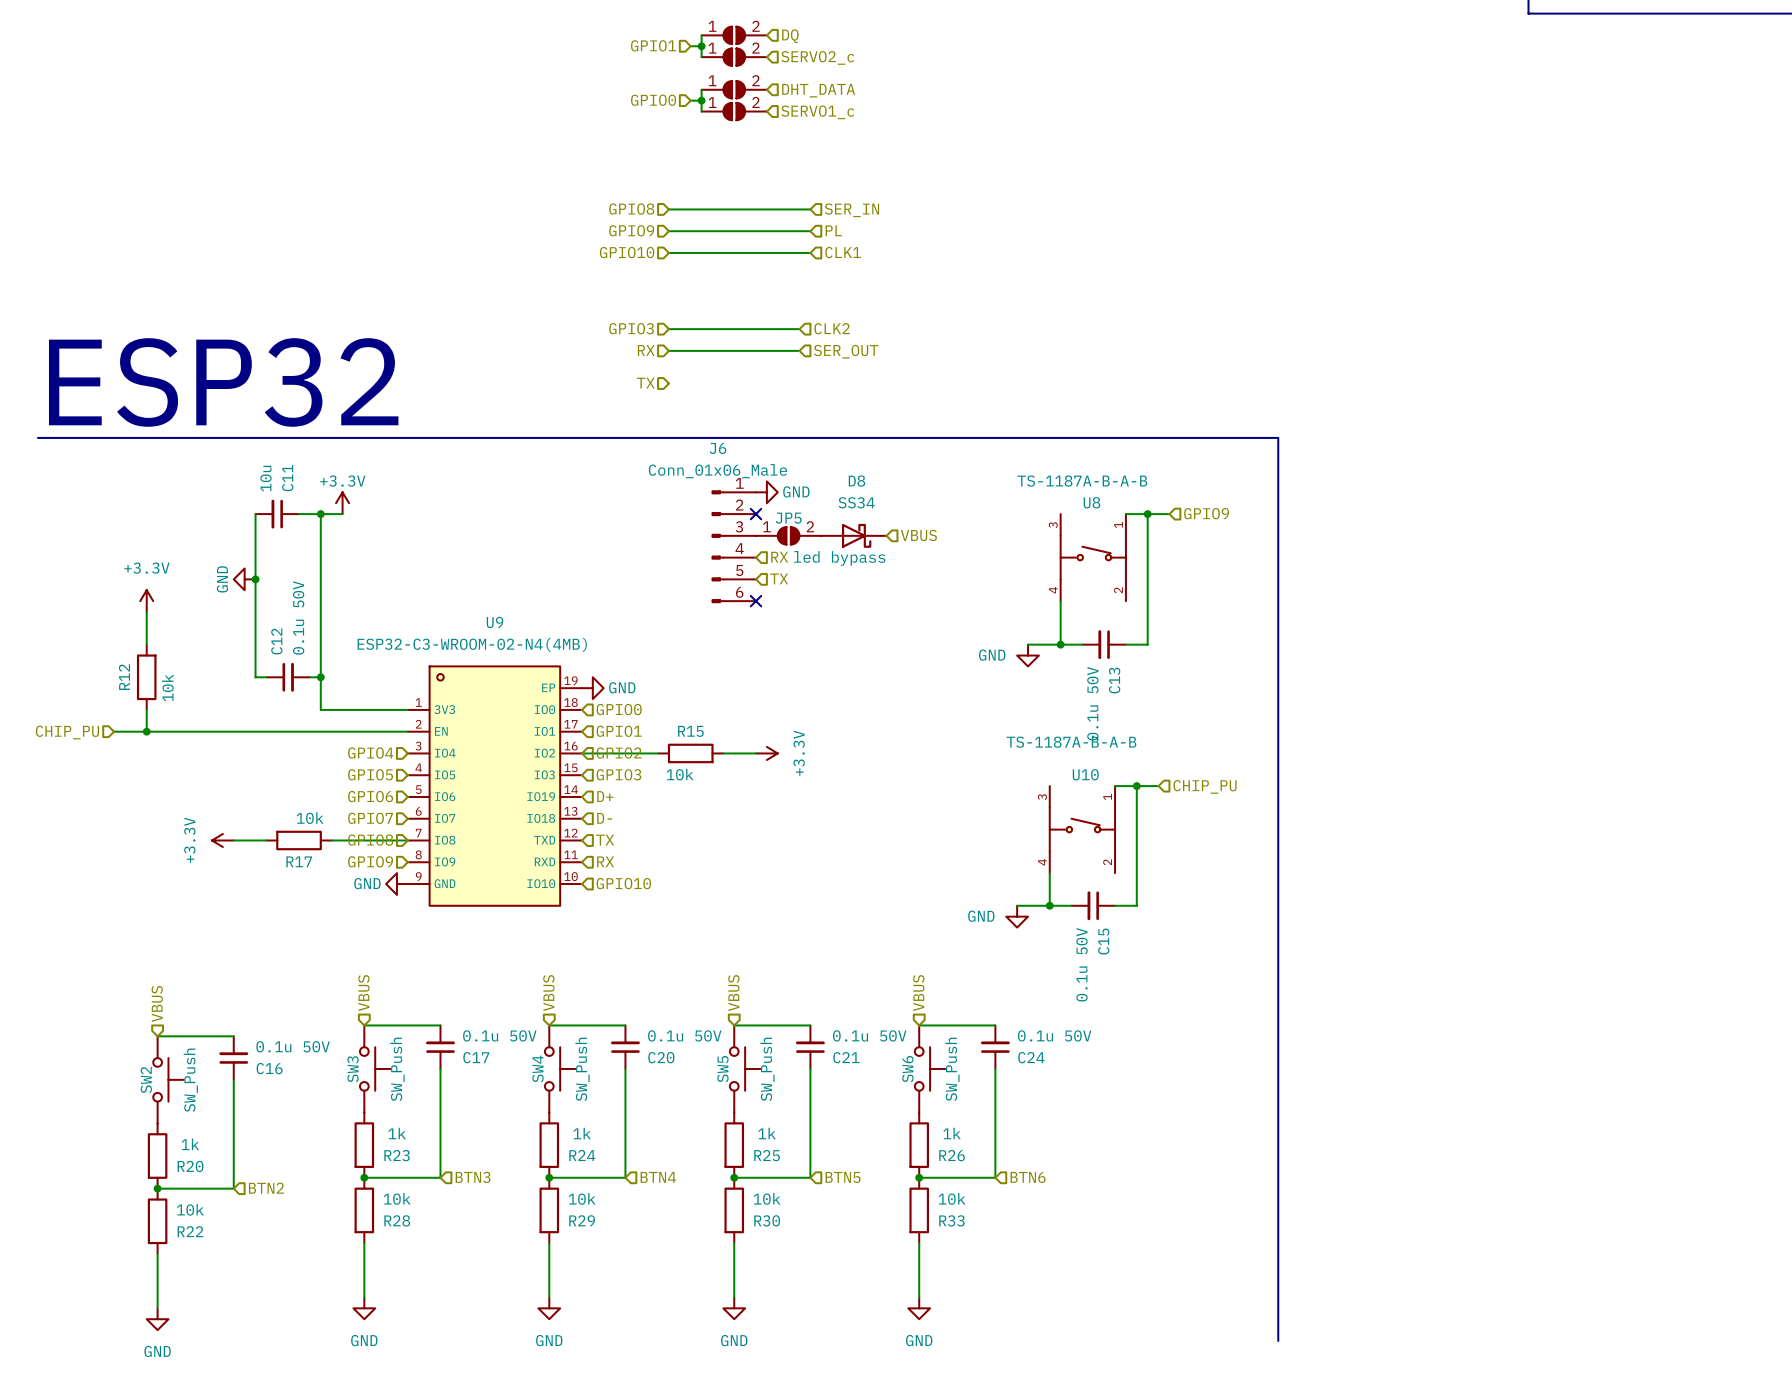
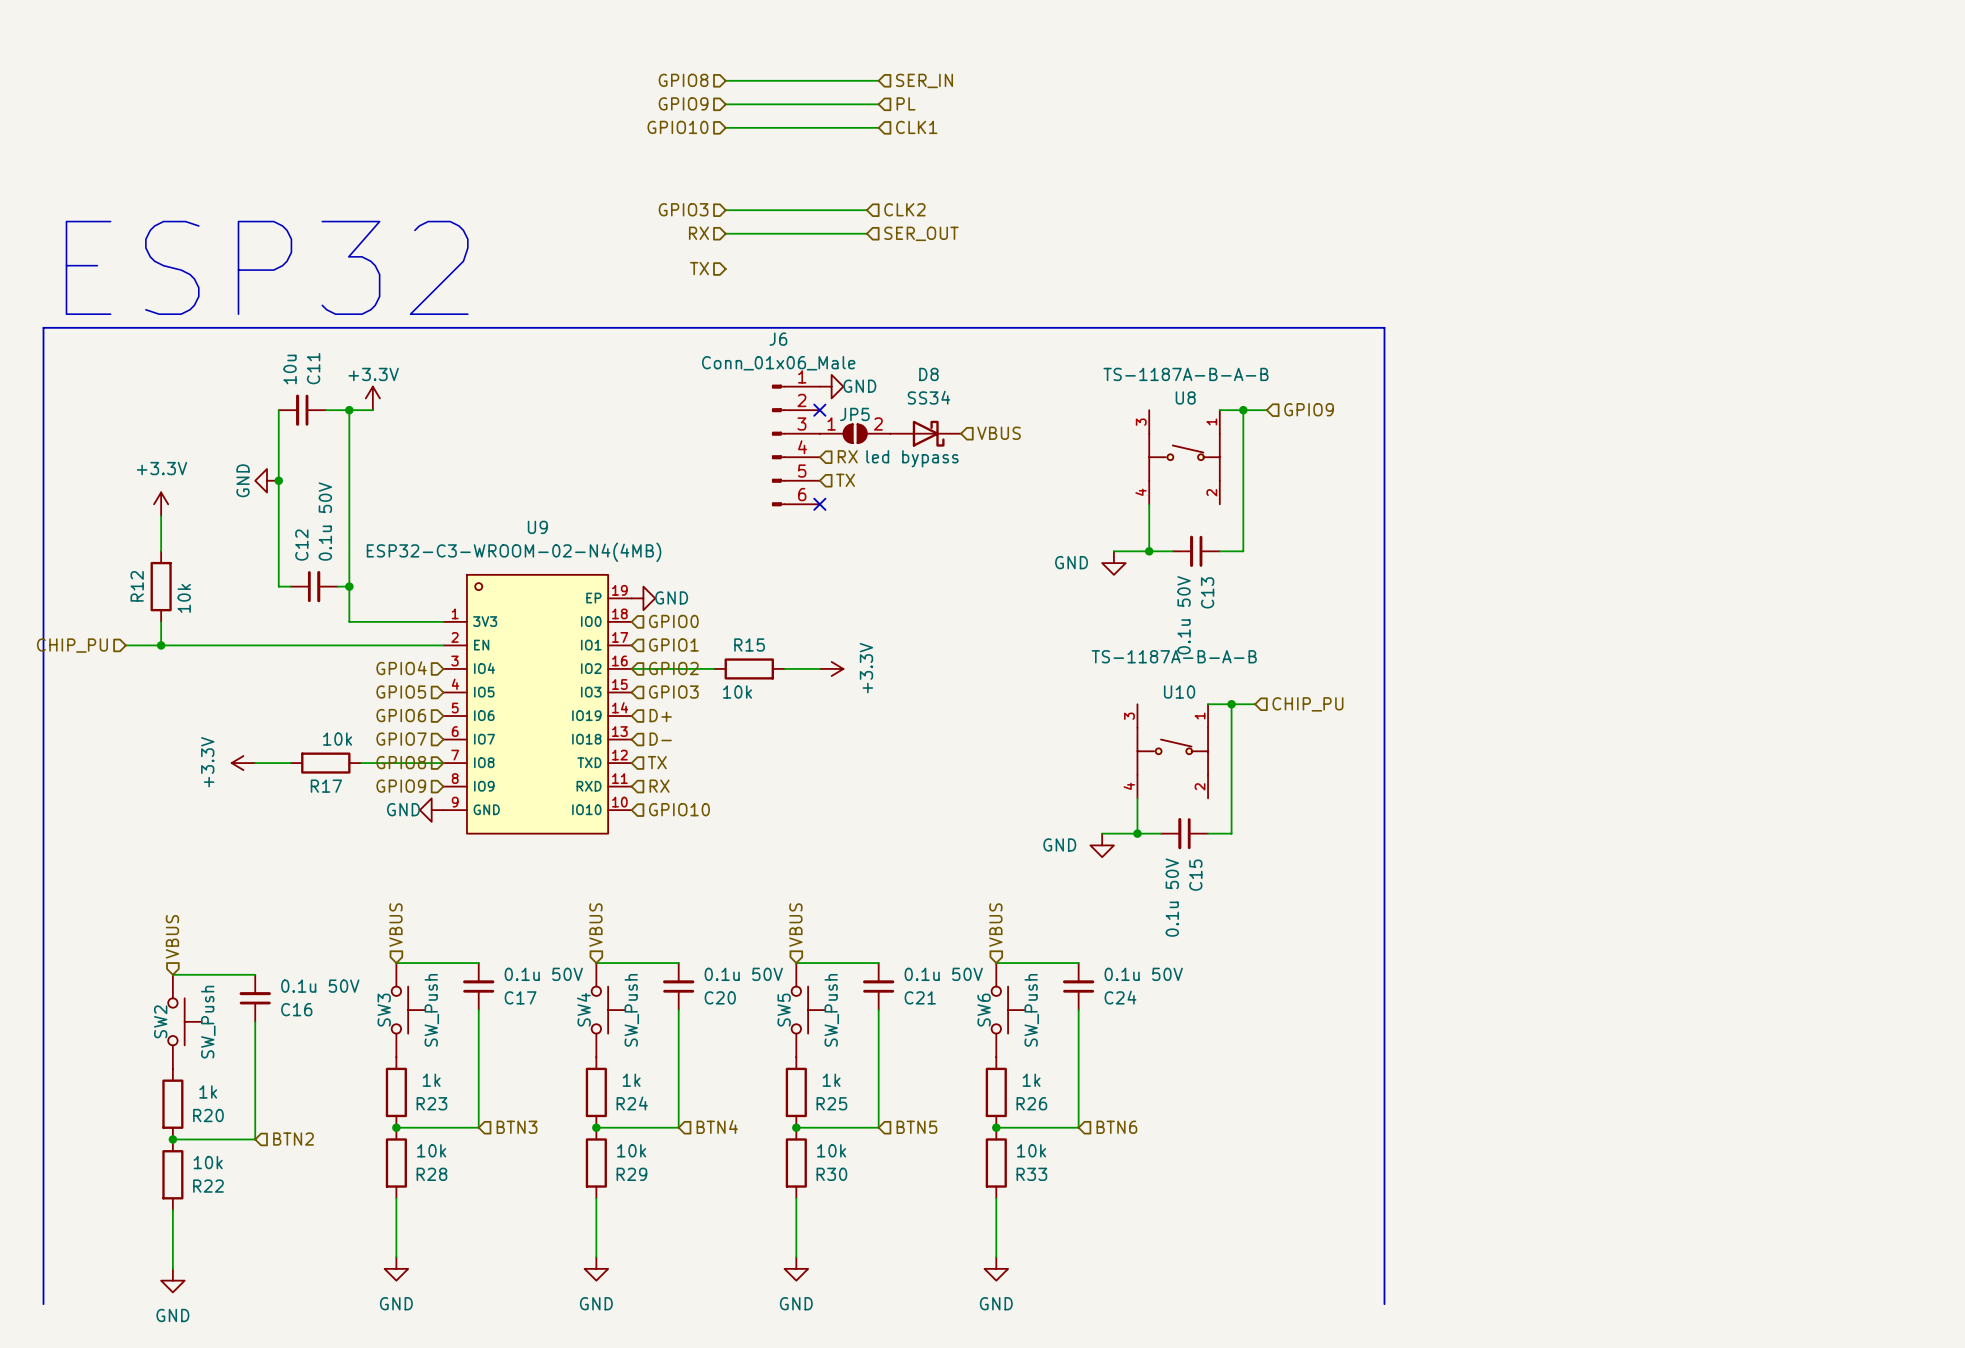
line: none -> (43, 327) (43, 1304)

